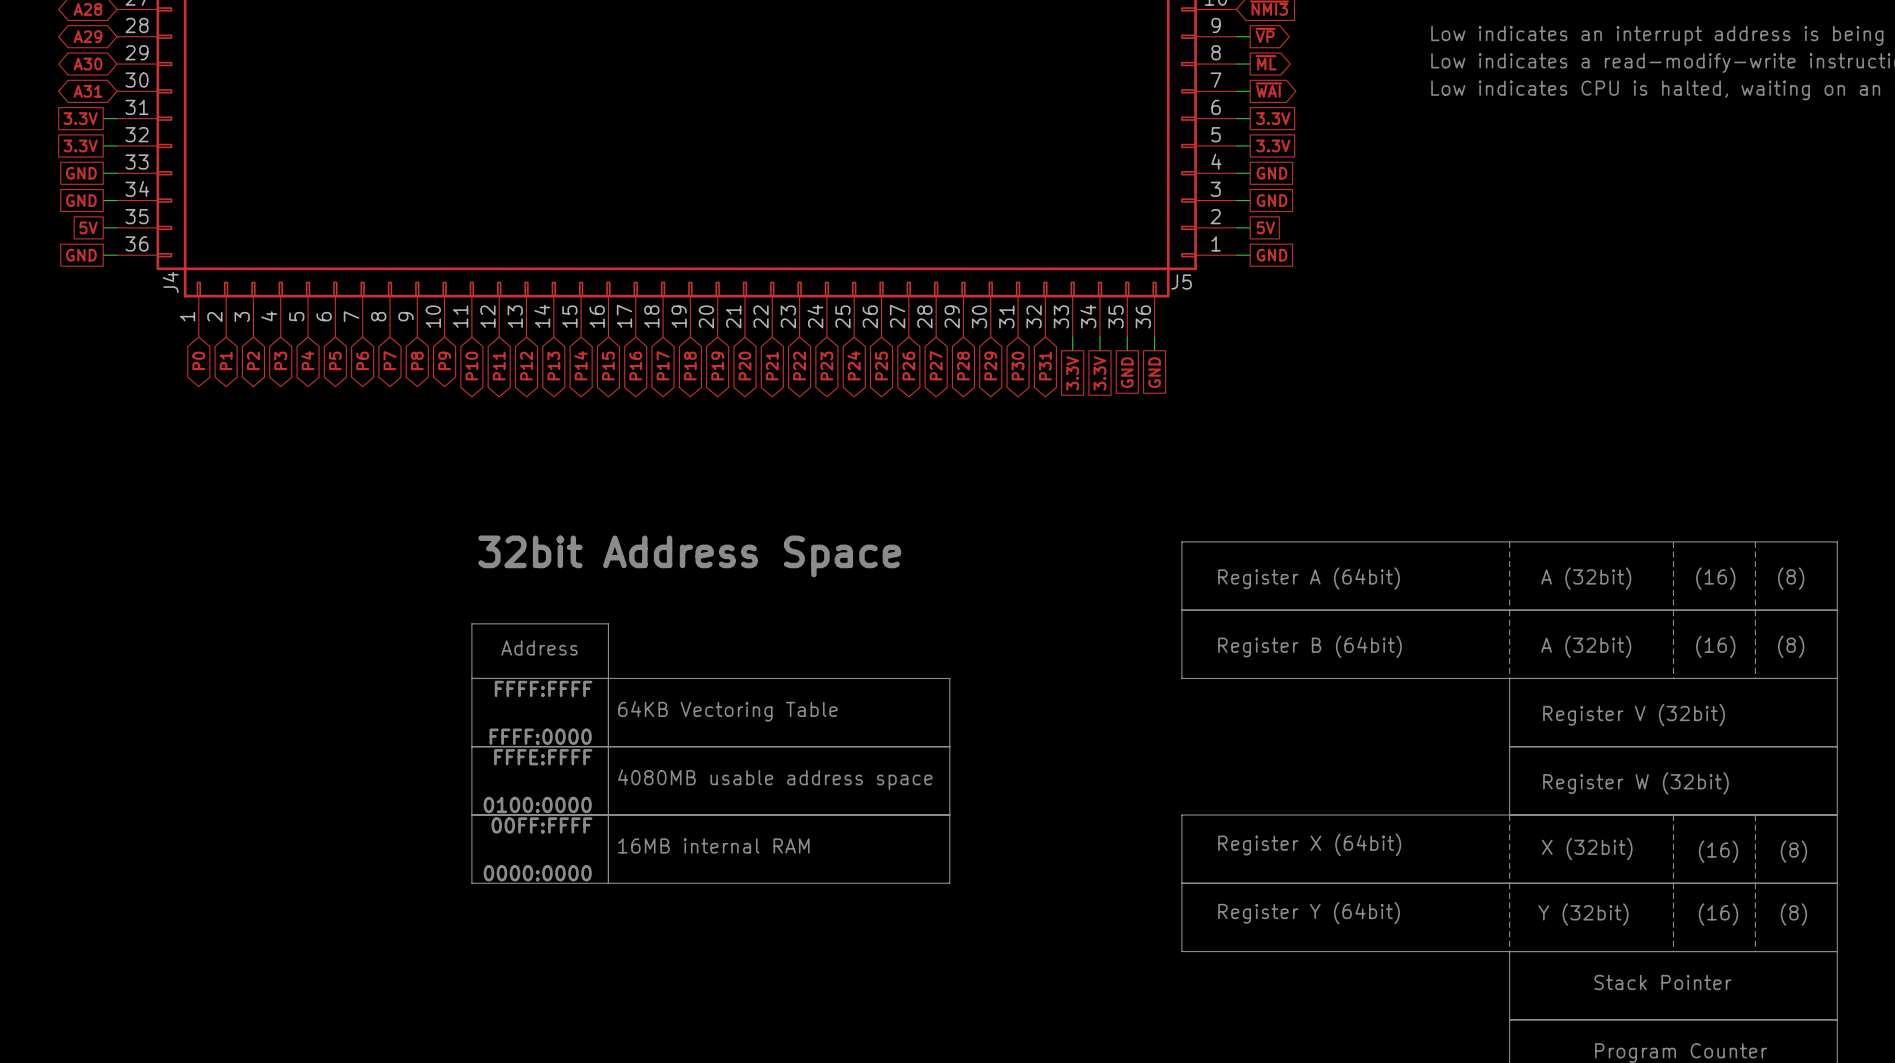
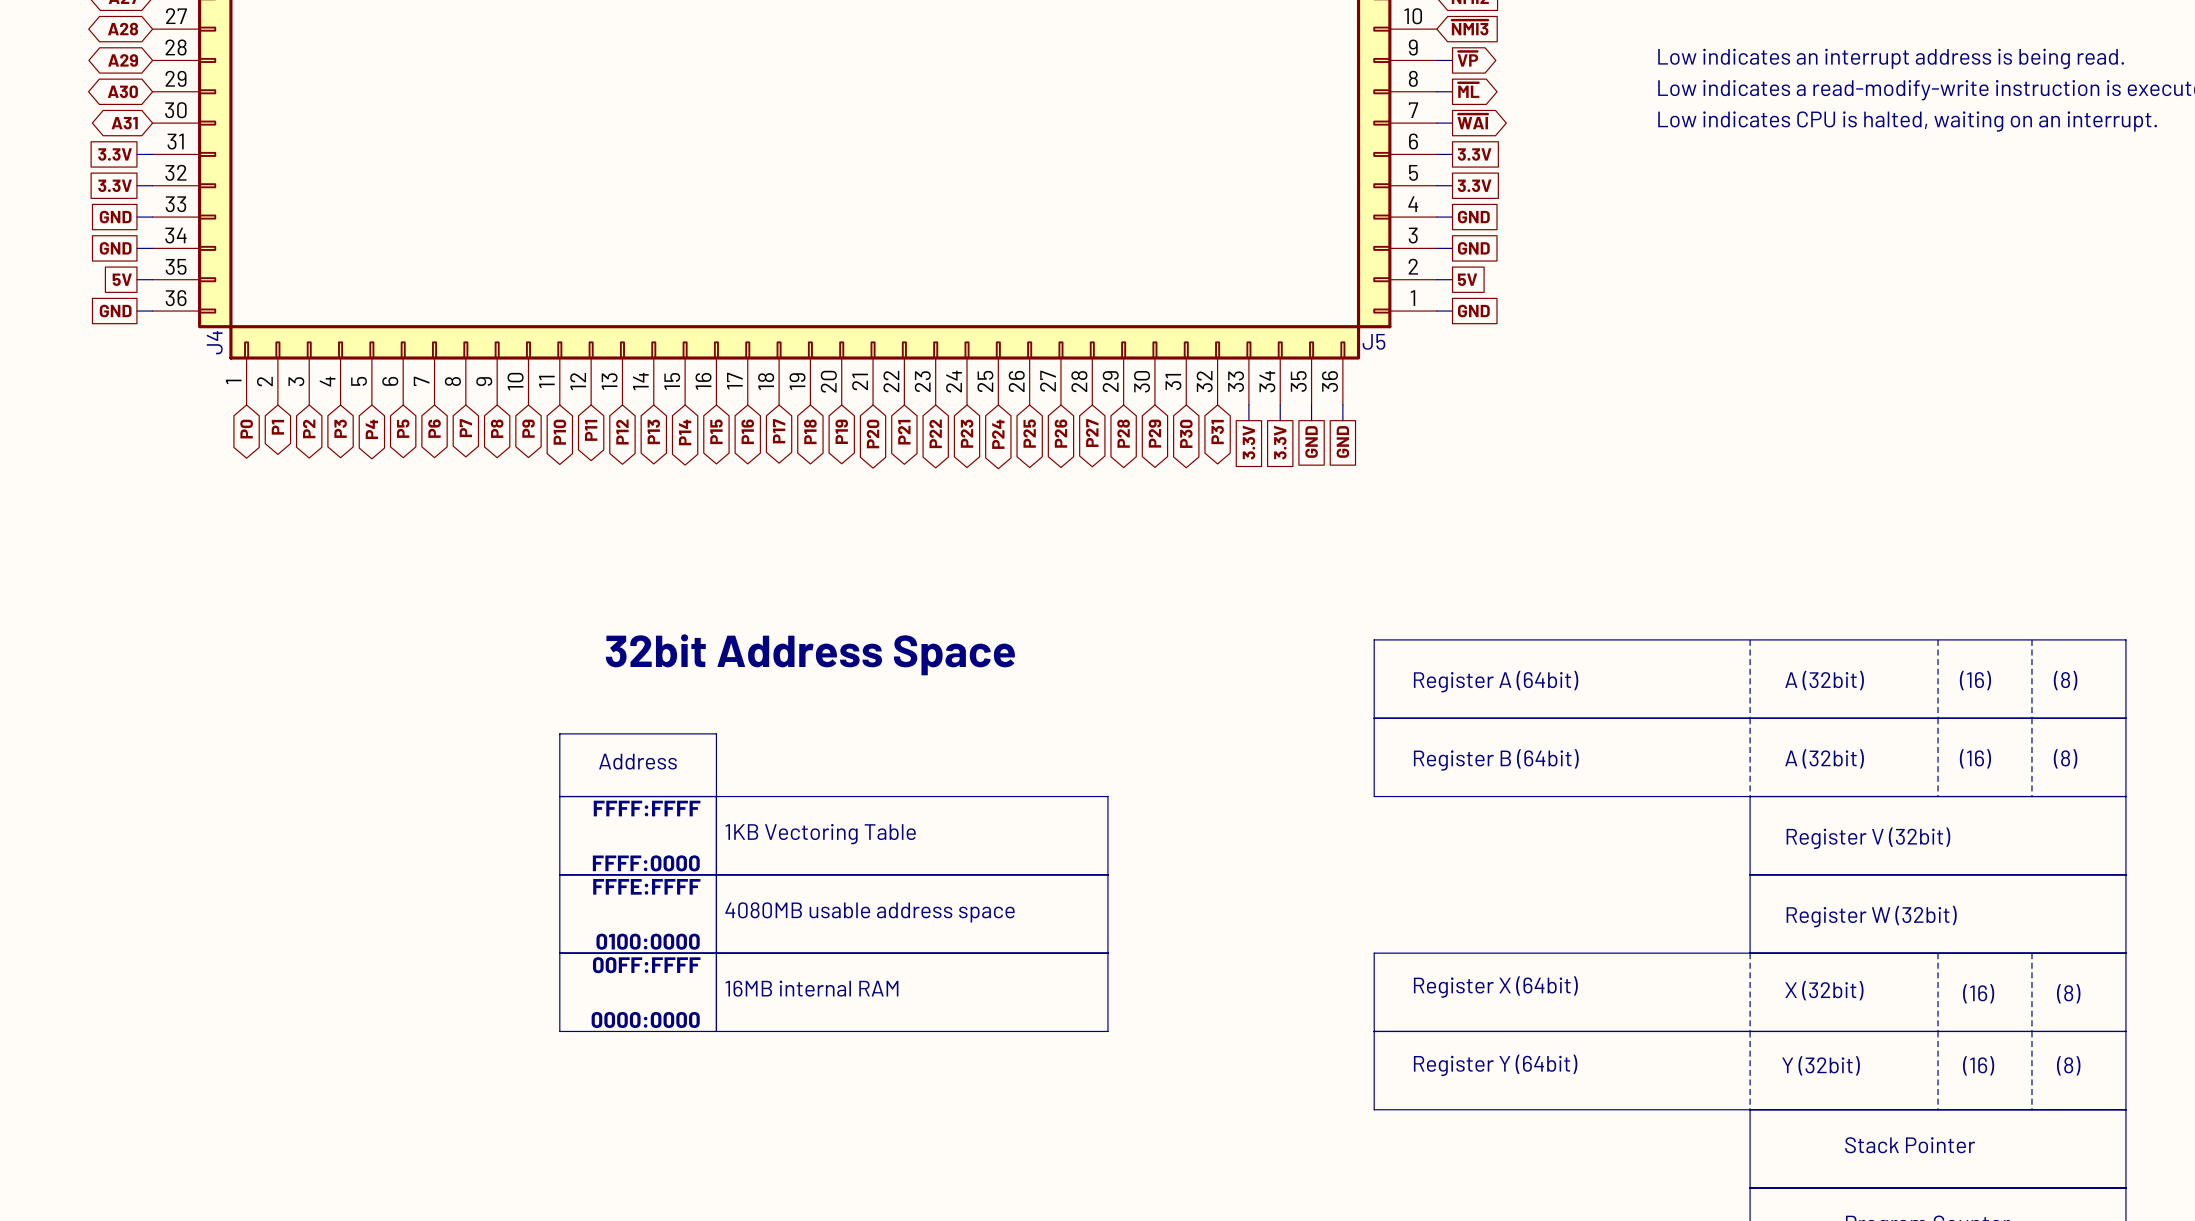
text: 64KB Vectoring Table (727, 711) -> 1KB Vectoring Table (820, 834)

